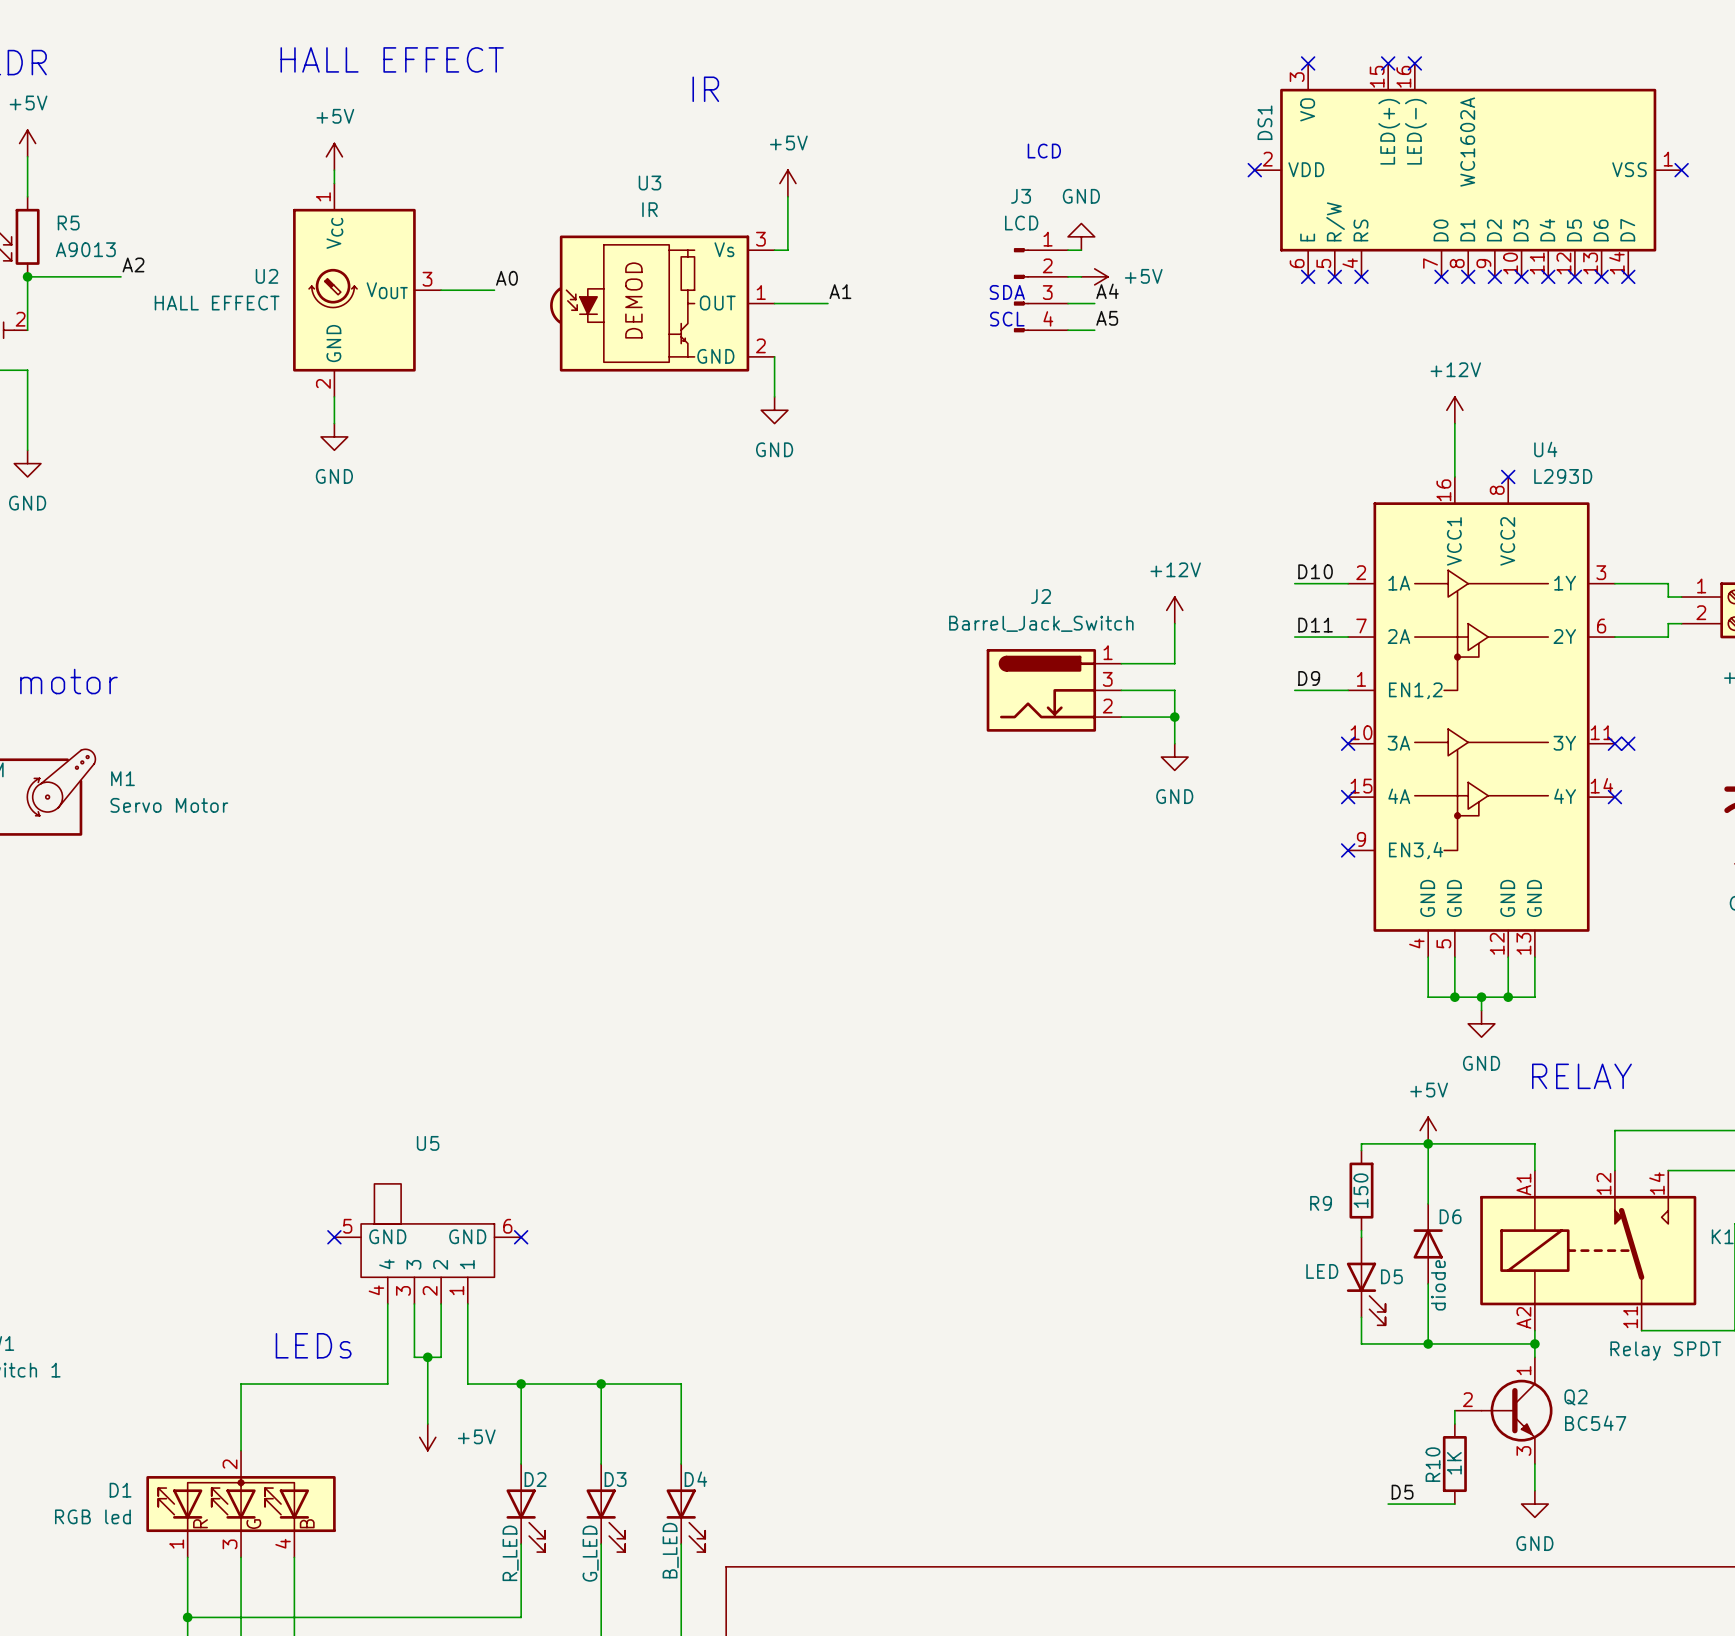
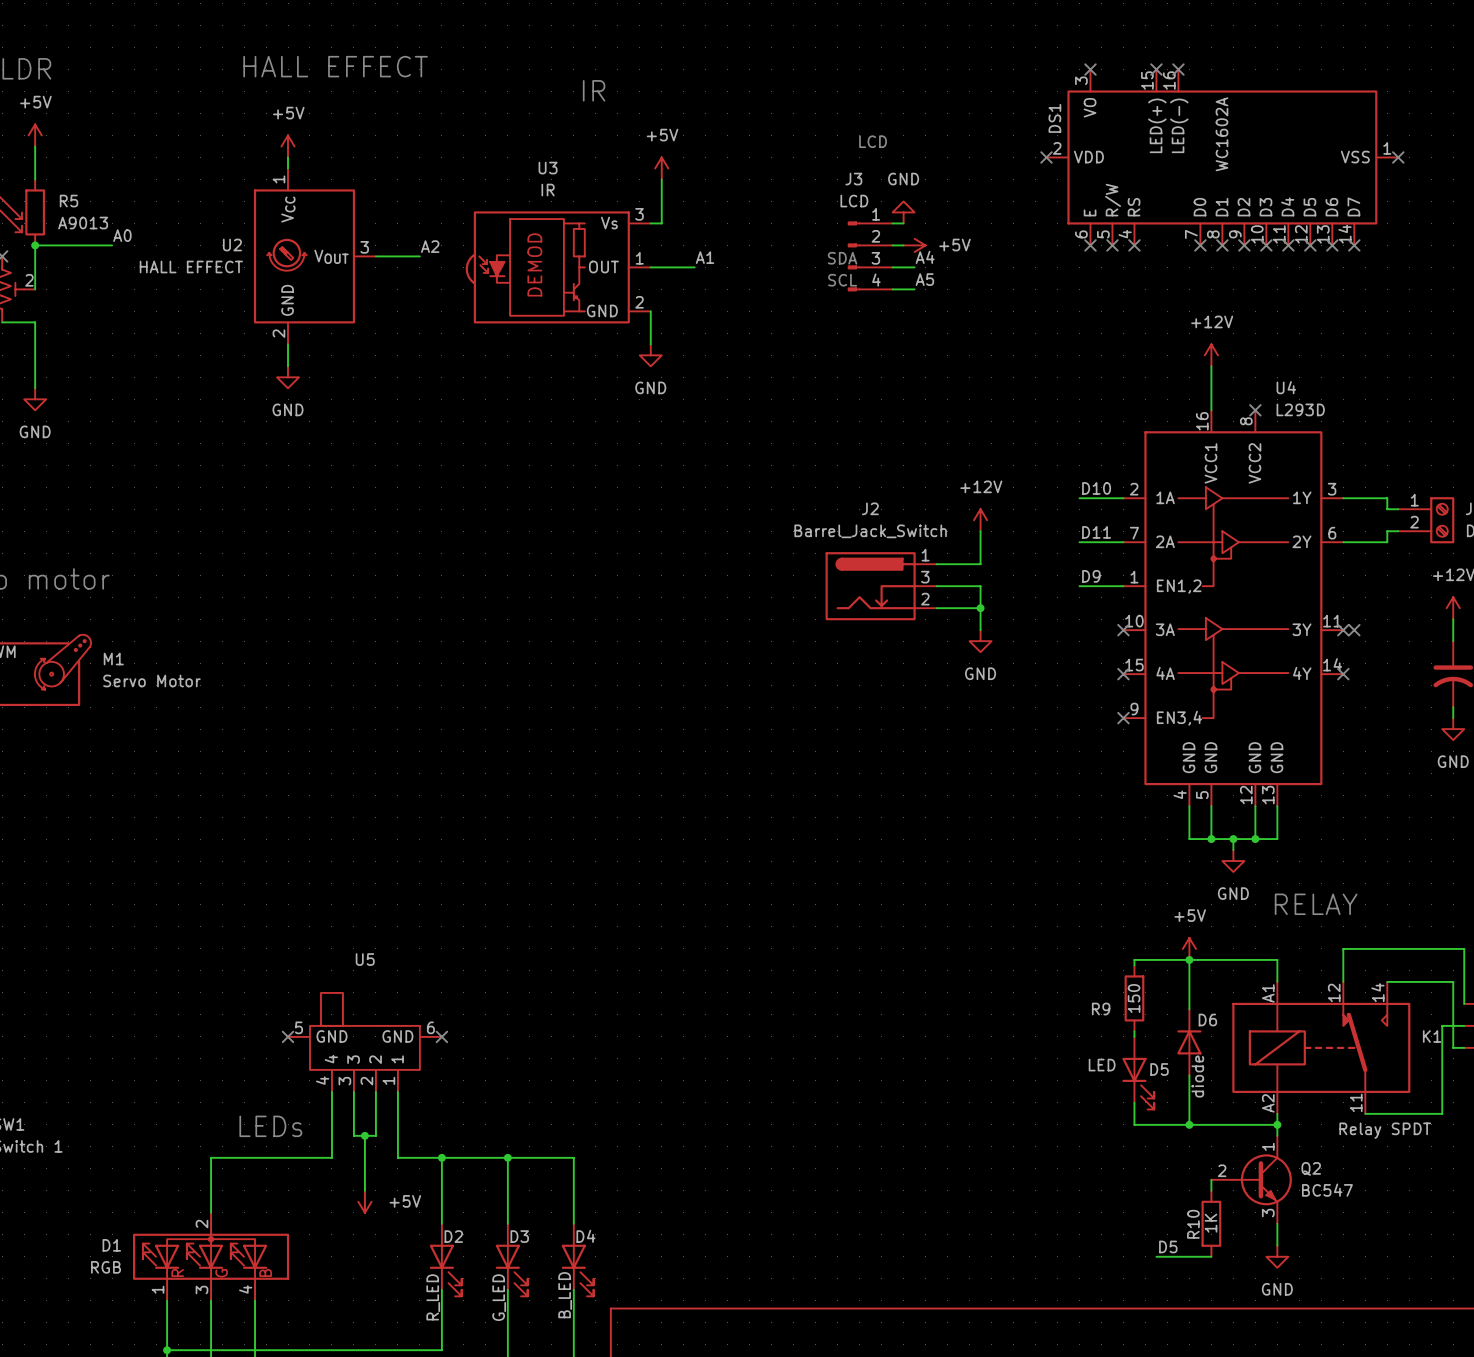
label: A2 (133, 264) -> A0 (122, 235)
label: A0 (506, 278) -> A2 (430, 246)
D1 value: RGB led (92, 1516) -> RGB (106, 1267)

